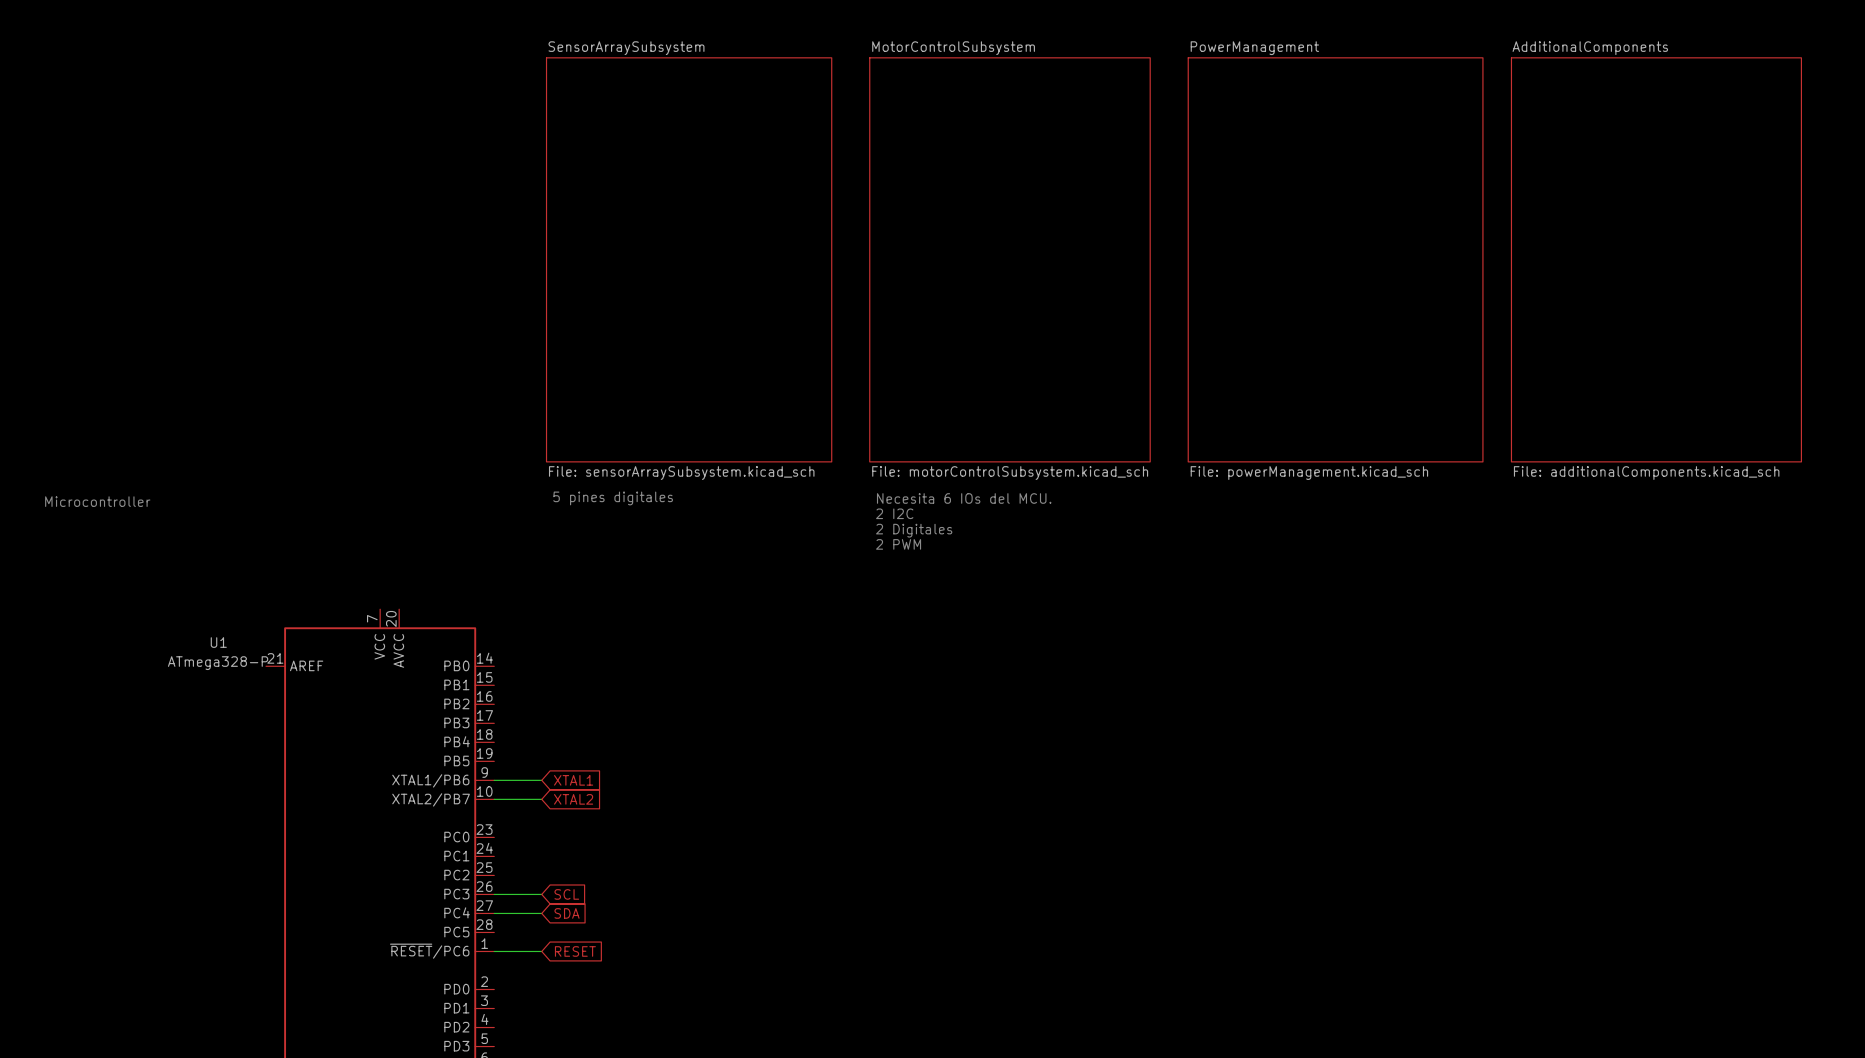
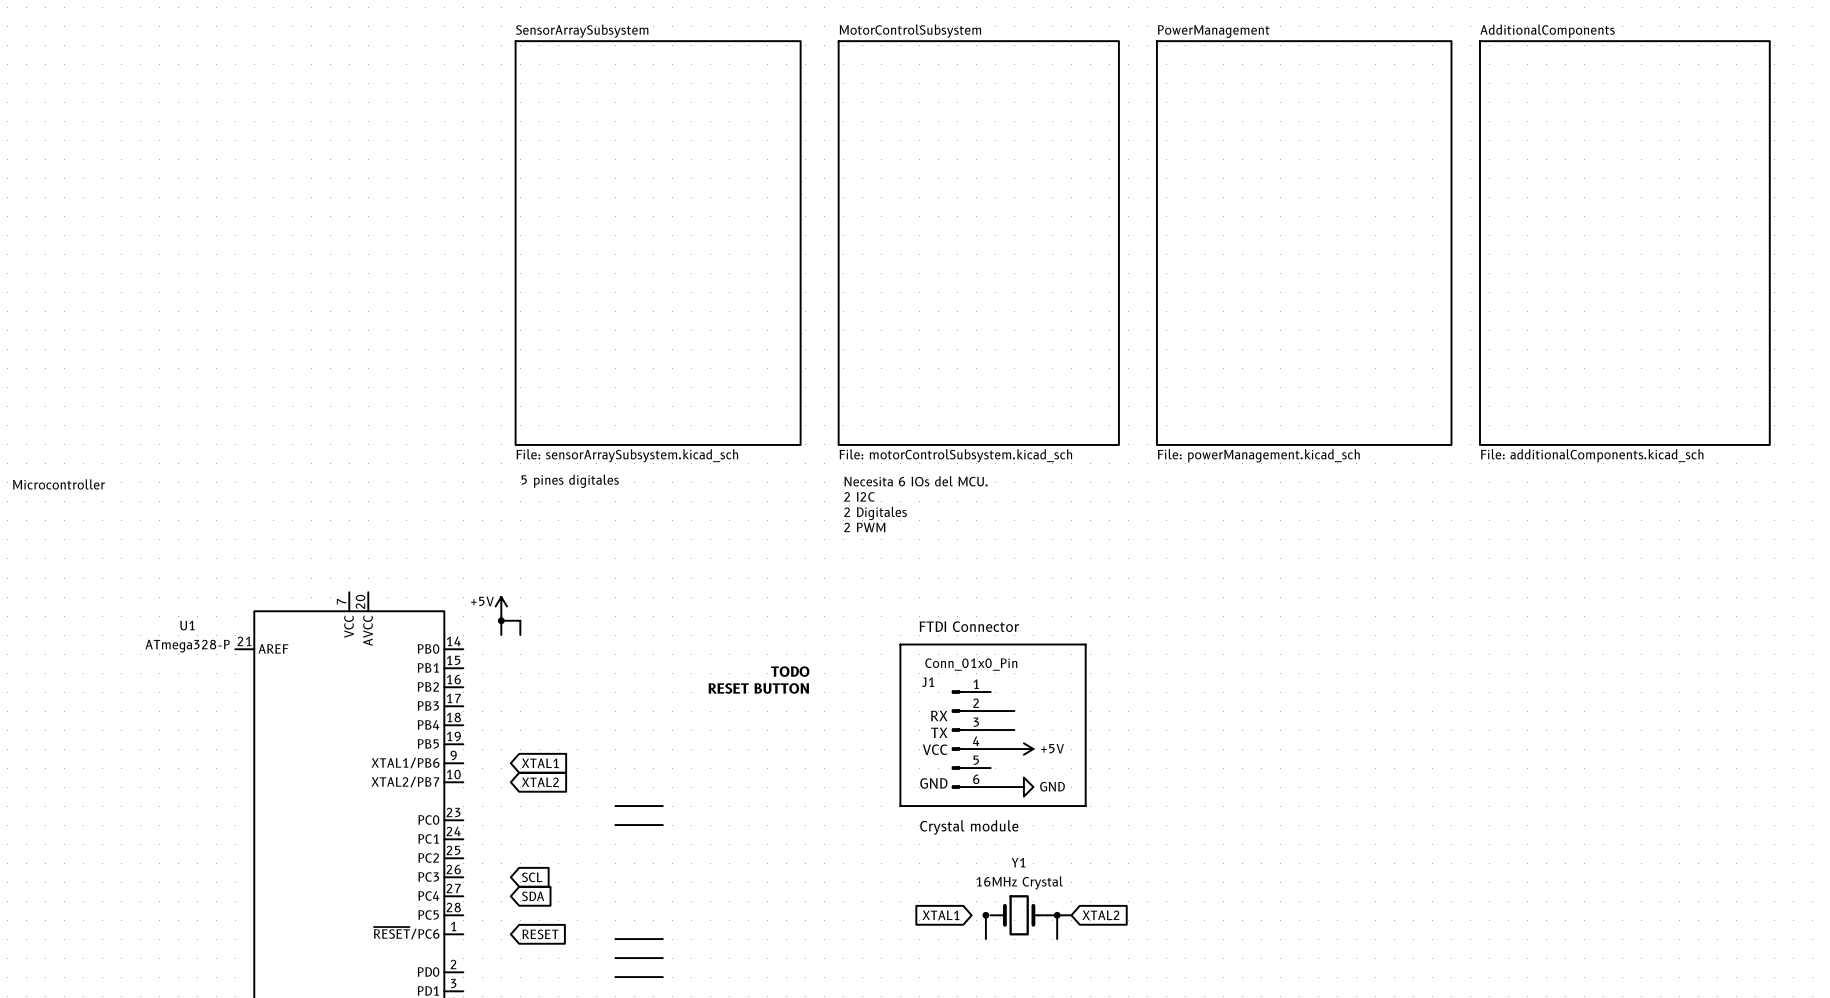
power symbol: none -> +5V (501, 606)
wire: none -> (501, 616) (501, 635)
wire: none -> (501, 620) (520, 620) (520, 635)
junction: none -> (501, 620)
text: none -> FTDI Connector (969, 626)
line: none -> (900, 644) (1085, 644) (1085, 806) (900, 806) (900, 644)
text: none -> TODO (790, 671)
text: none -> RESET BUTTON (758, 688)
wire: none -> (990, 711) (1014, 711)
text: none -> RX (939, 715)
wire: none -> (990, 730) (1014, 730)
text: none -> TX (939, 732)
J1: none -> Conn_01x0_Pin (971, 739)
text: none -> VCC (935, 749)
wire: none -> (990, 749) (1014, 749)
power symbol: none -> +5V (1023, 749)
wire: (494, 780) (541, 780) -> (615, 806) (662, 806)
wire: (494, 799) (541, 799) -> (615, 825) (662, 825)
text: none -> GND (933, 783)
wire: none -> (990, 787) (1014, 787)
power symbol: none -> GND (1023, 787)
text: none -> Crystal module (969, 827)
wire: (494, 894) (541, 894) -> (615, 958) (662, 958)
wire: (494, 913) (541, 913) -> (615, 939) (662, 939)
global label: none -> XTAL1 (940, 915)
wire: none -> (985, 915) (985, 939)
junction: none -> (985, 915)
Y1: none -> 16MHz Crystal (1019, 915)
wire: none -> (1047, 915) (1071, 915)
wire: none -> (1057, 915) (1057, 939)
junction: none -> (1057, 915)
global label: none -> XTAL2 (1100, 915)
wire: (494, 951) (541, 951) -> (615, 977) (662, 977)

